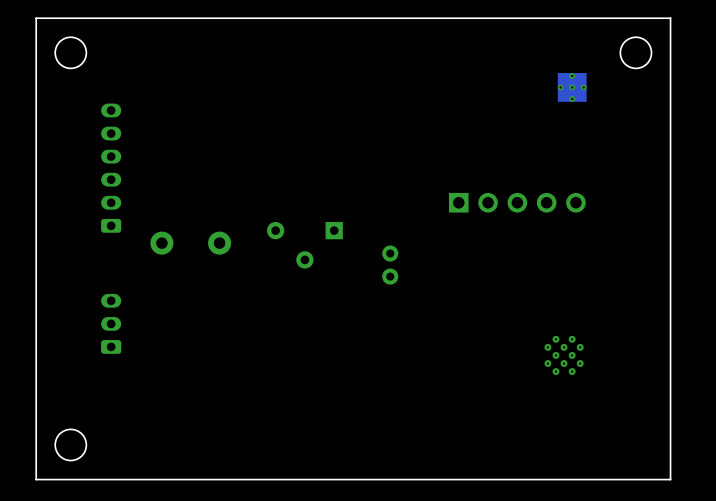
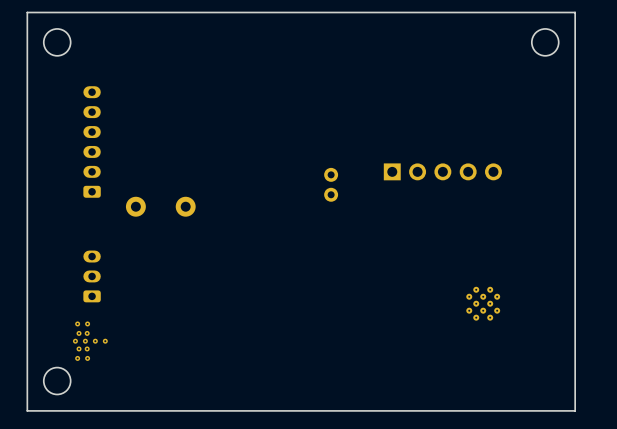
part: (572, 87) -> none
part: (304, 245) -> none
part position: (390, 265) -> (331, 184)
part: none -> (90, 341)

